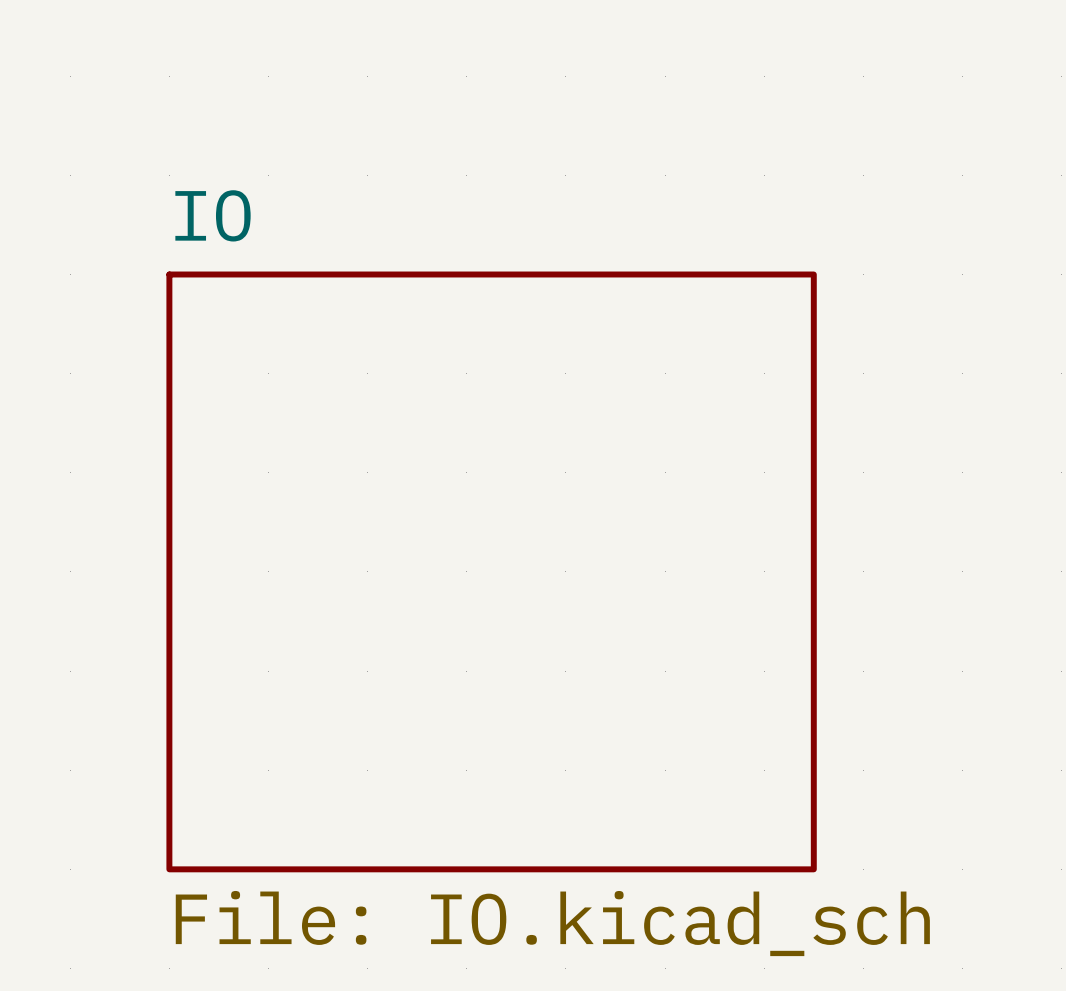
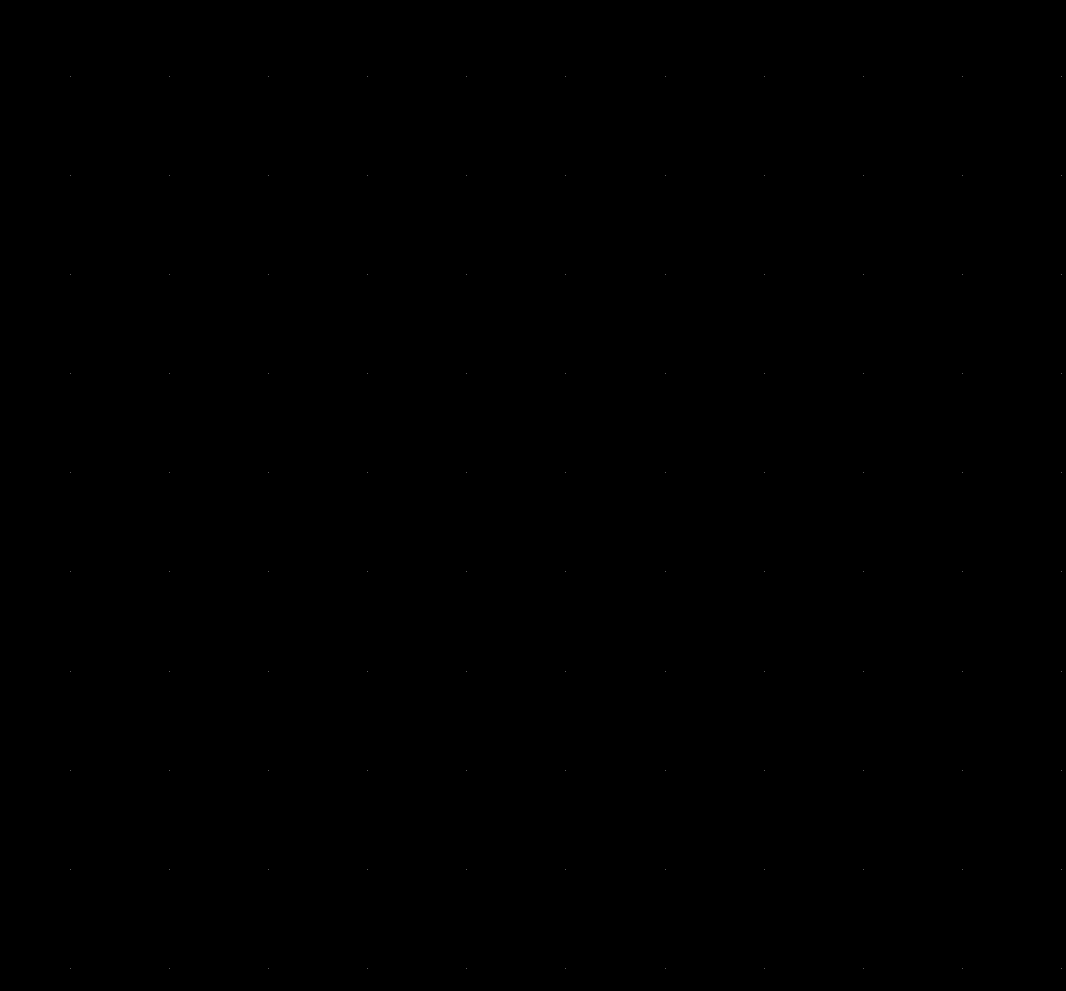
sheet IO: File: IO.kicad_sch (491, 571) -> none

